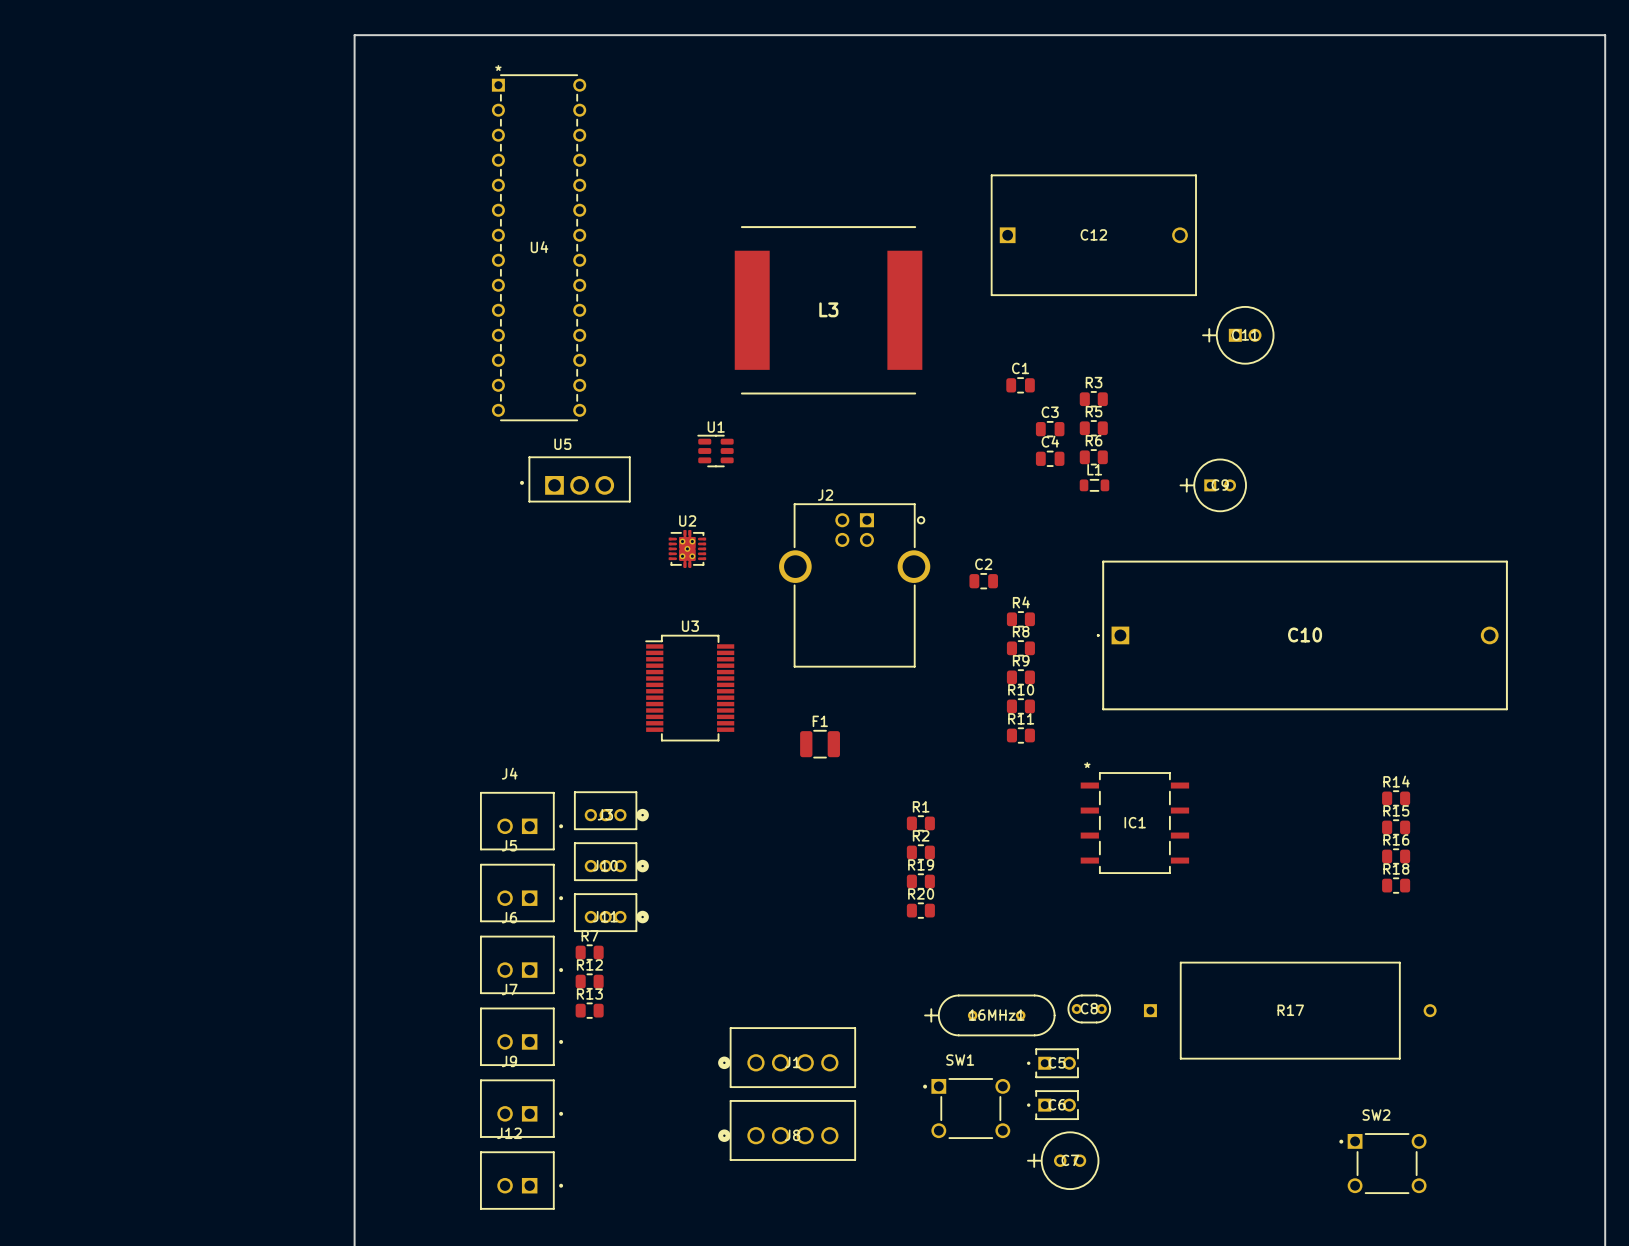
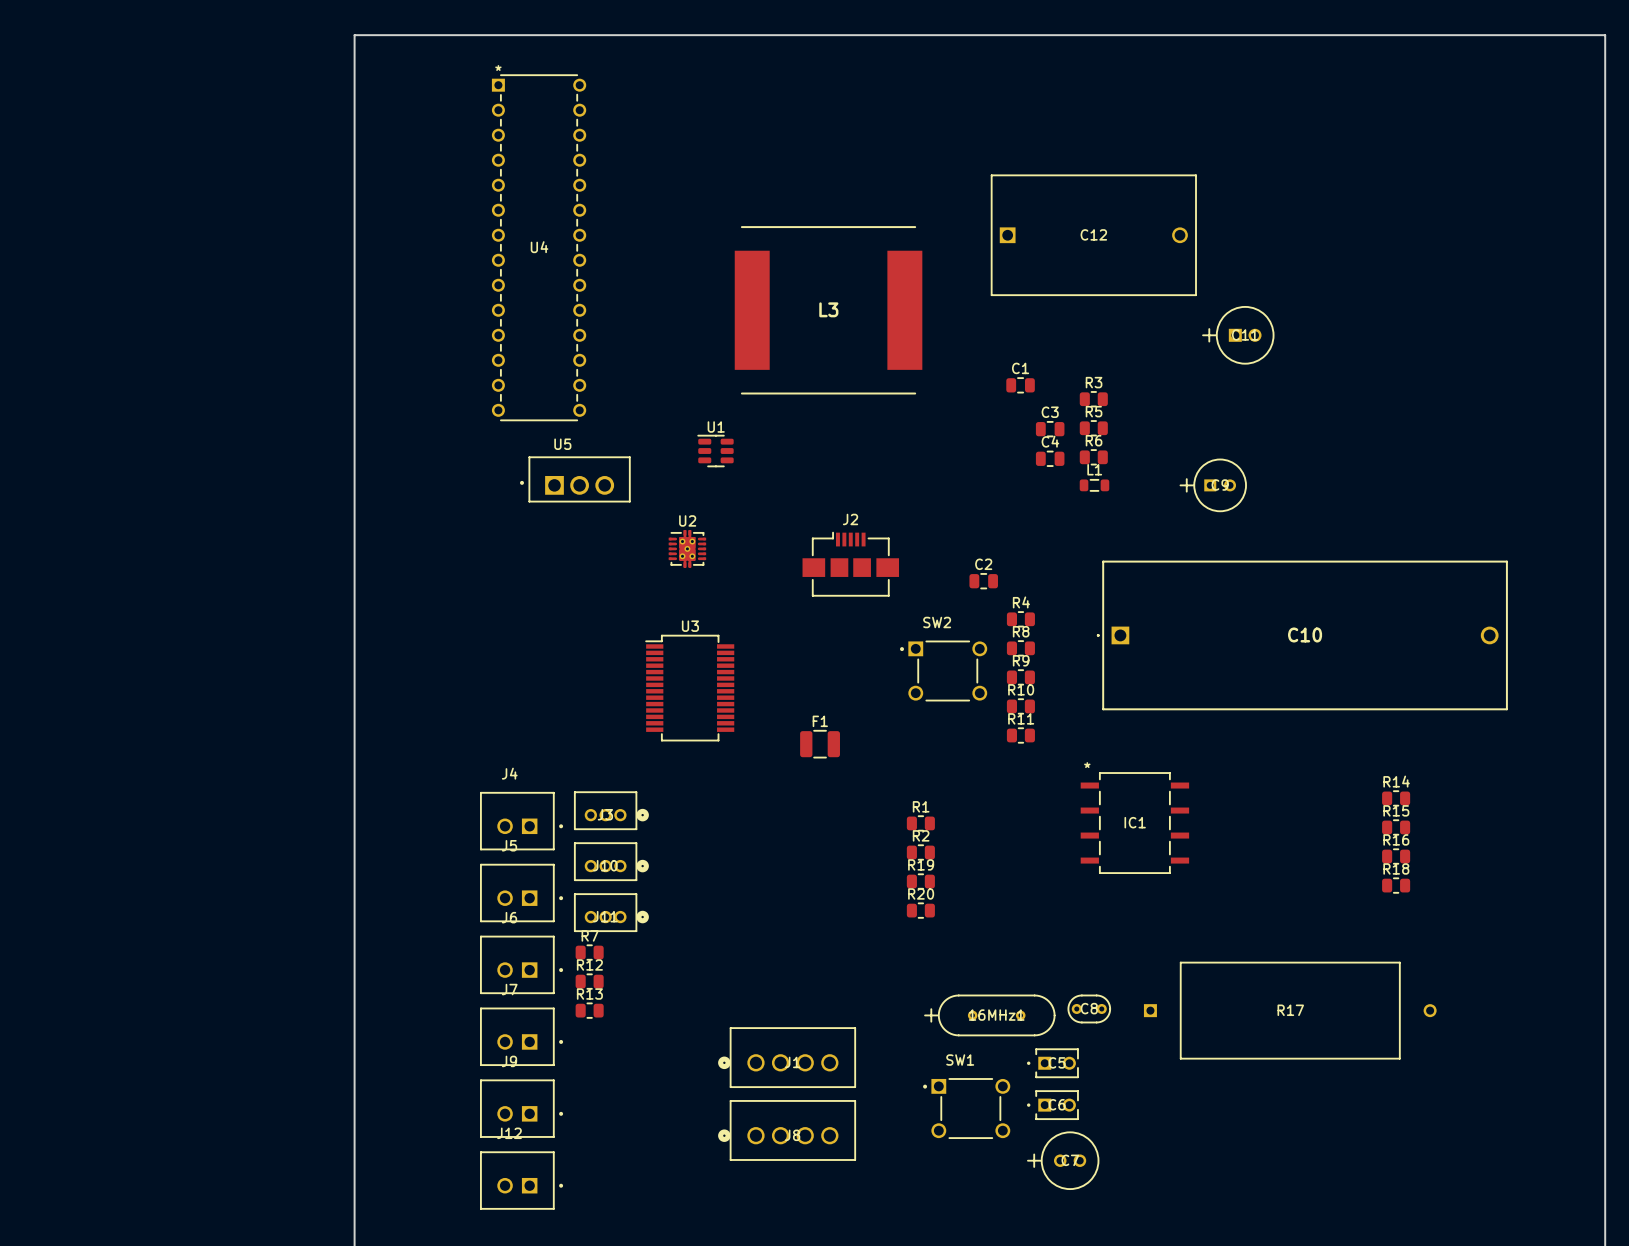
J2 name position: J2 (825, 495) -> J2 (850, 519)
J2 footprint: [779, 503, 931, 668] -> [802, 532, 900, 597]
SW2 position: (1382, 1163) -> (943, 671)

